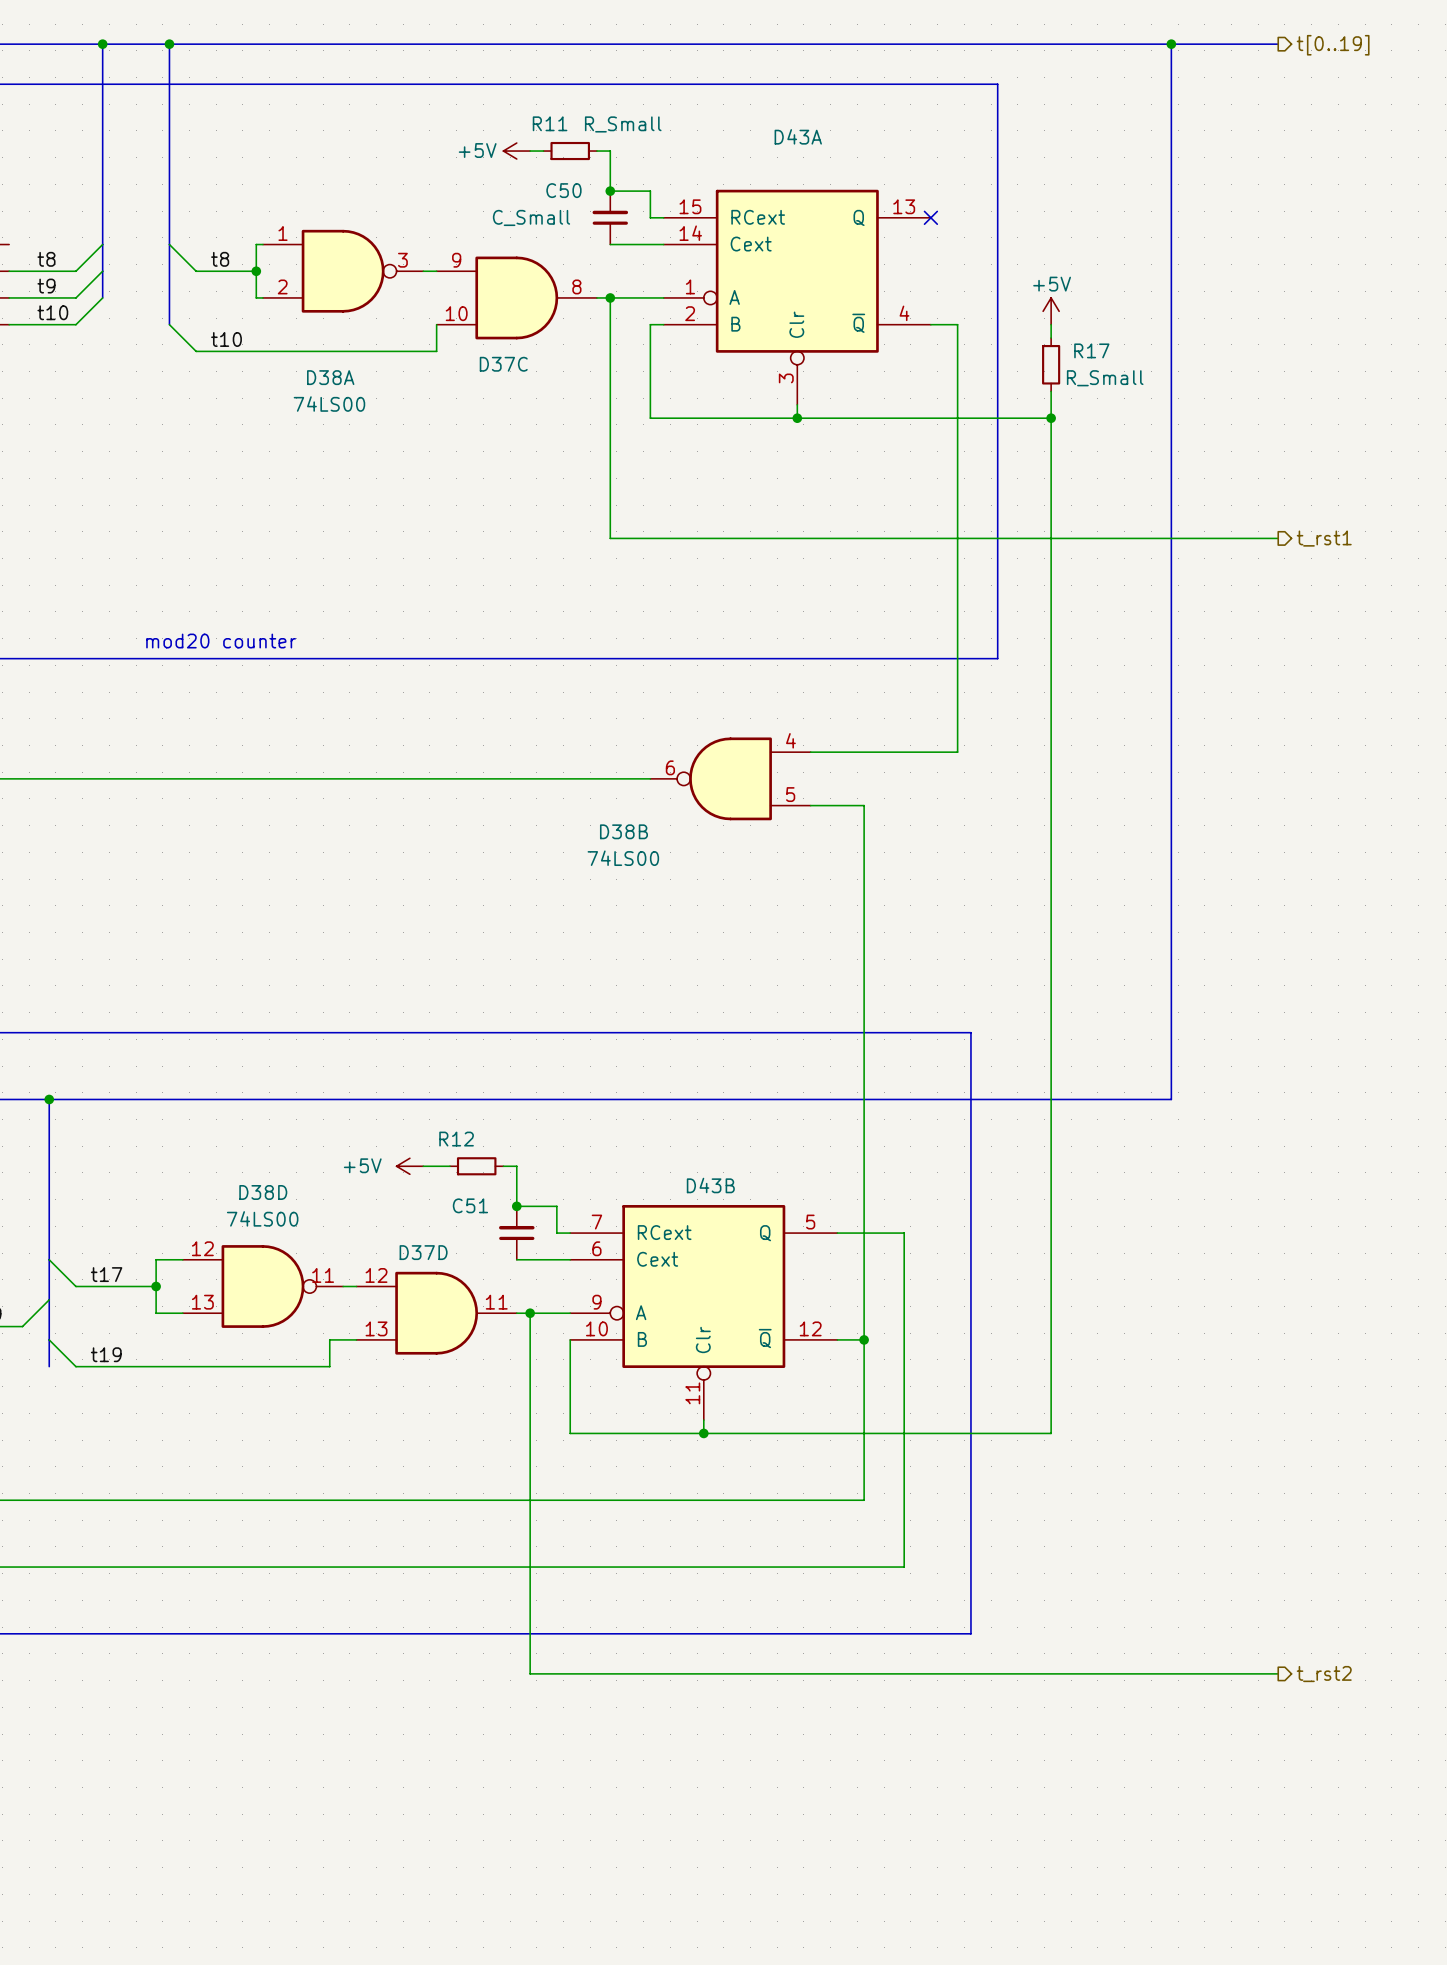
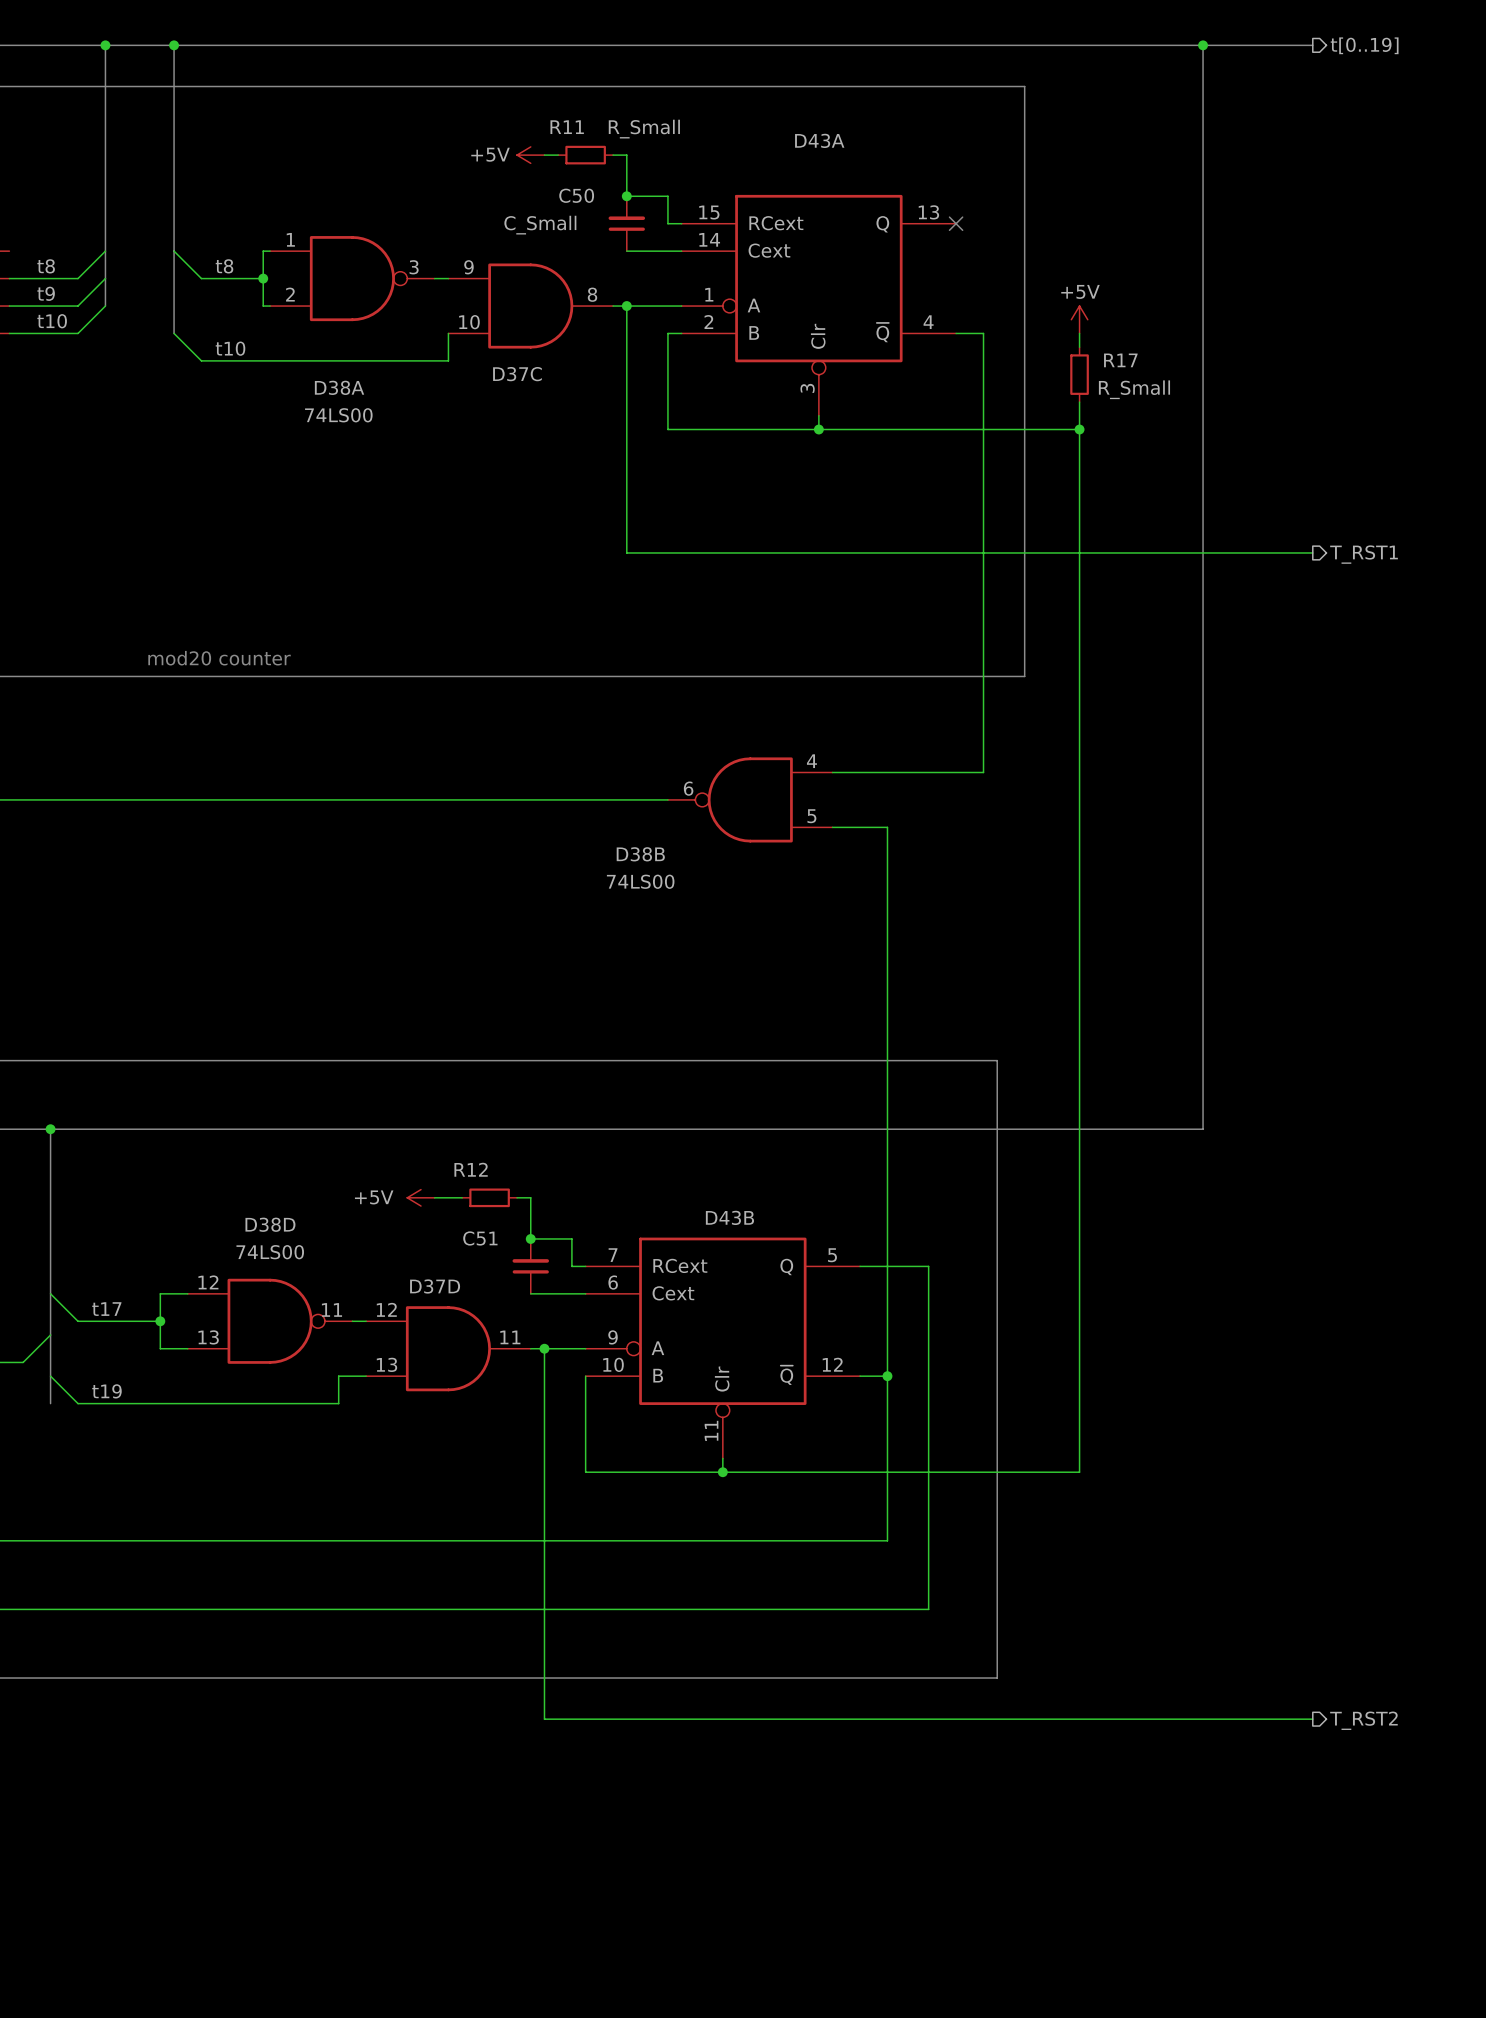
hierarchical label: t_rst1 (1324, 538) -> T_RST1 (1364, 554)
hierarchical label: t_rst2 (1324, 1674) -> T_RST2 (1363, 1720)

